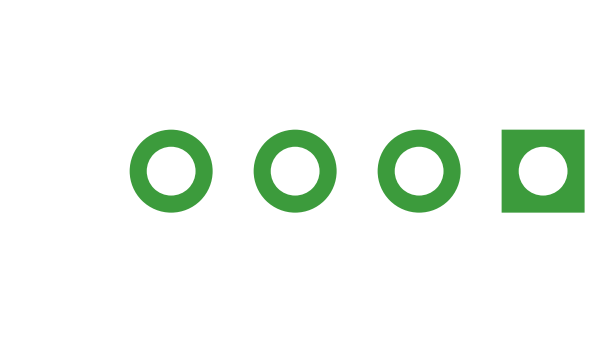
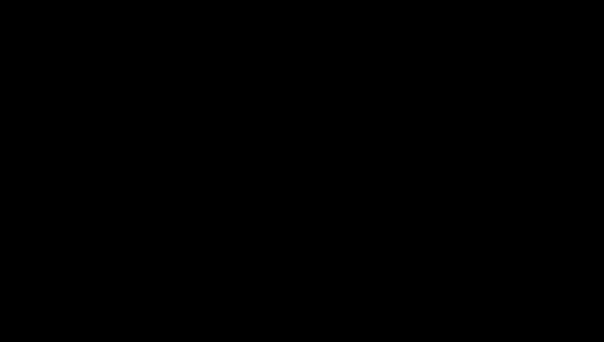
part: (357, 171) -> none

